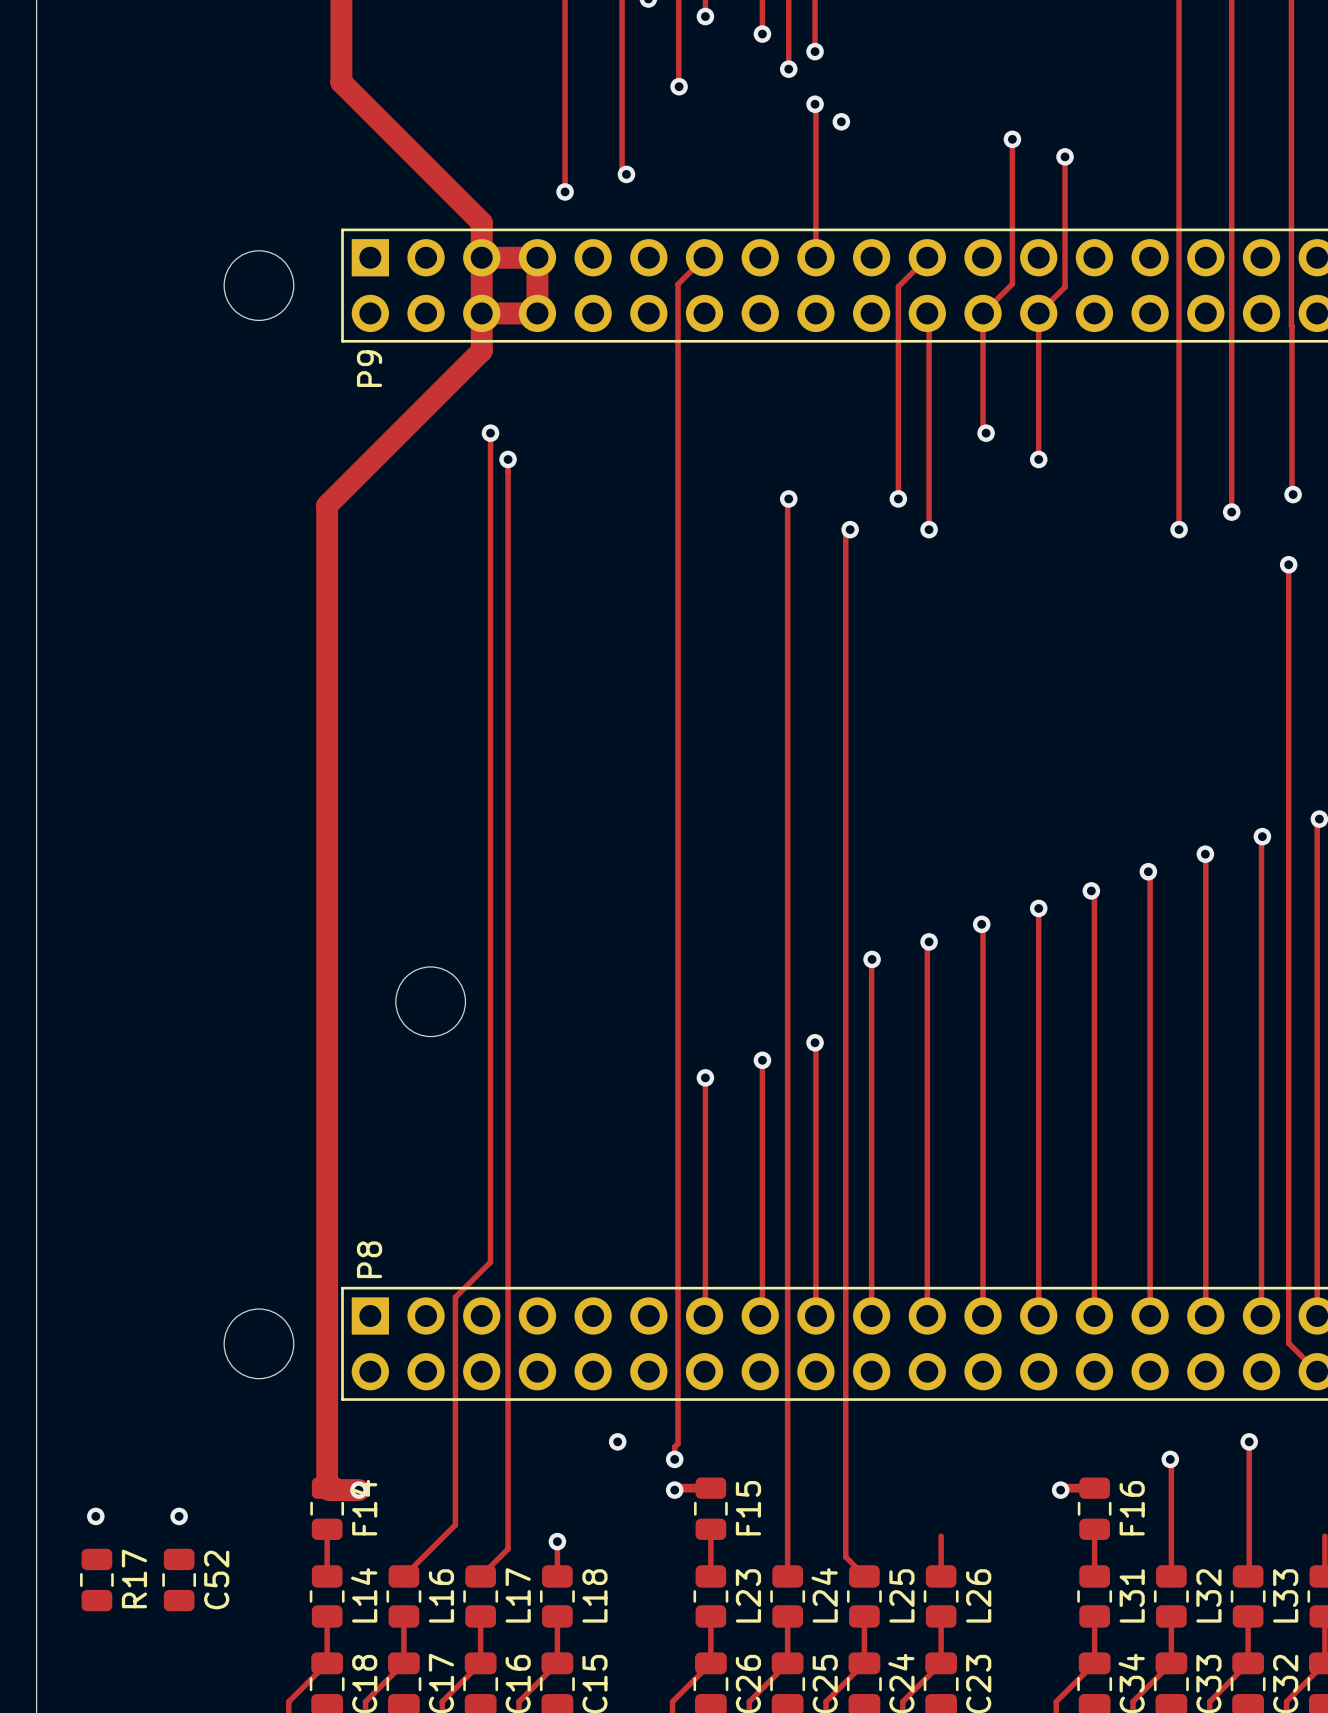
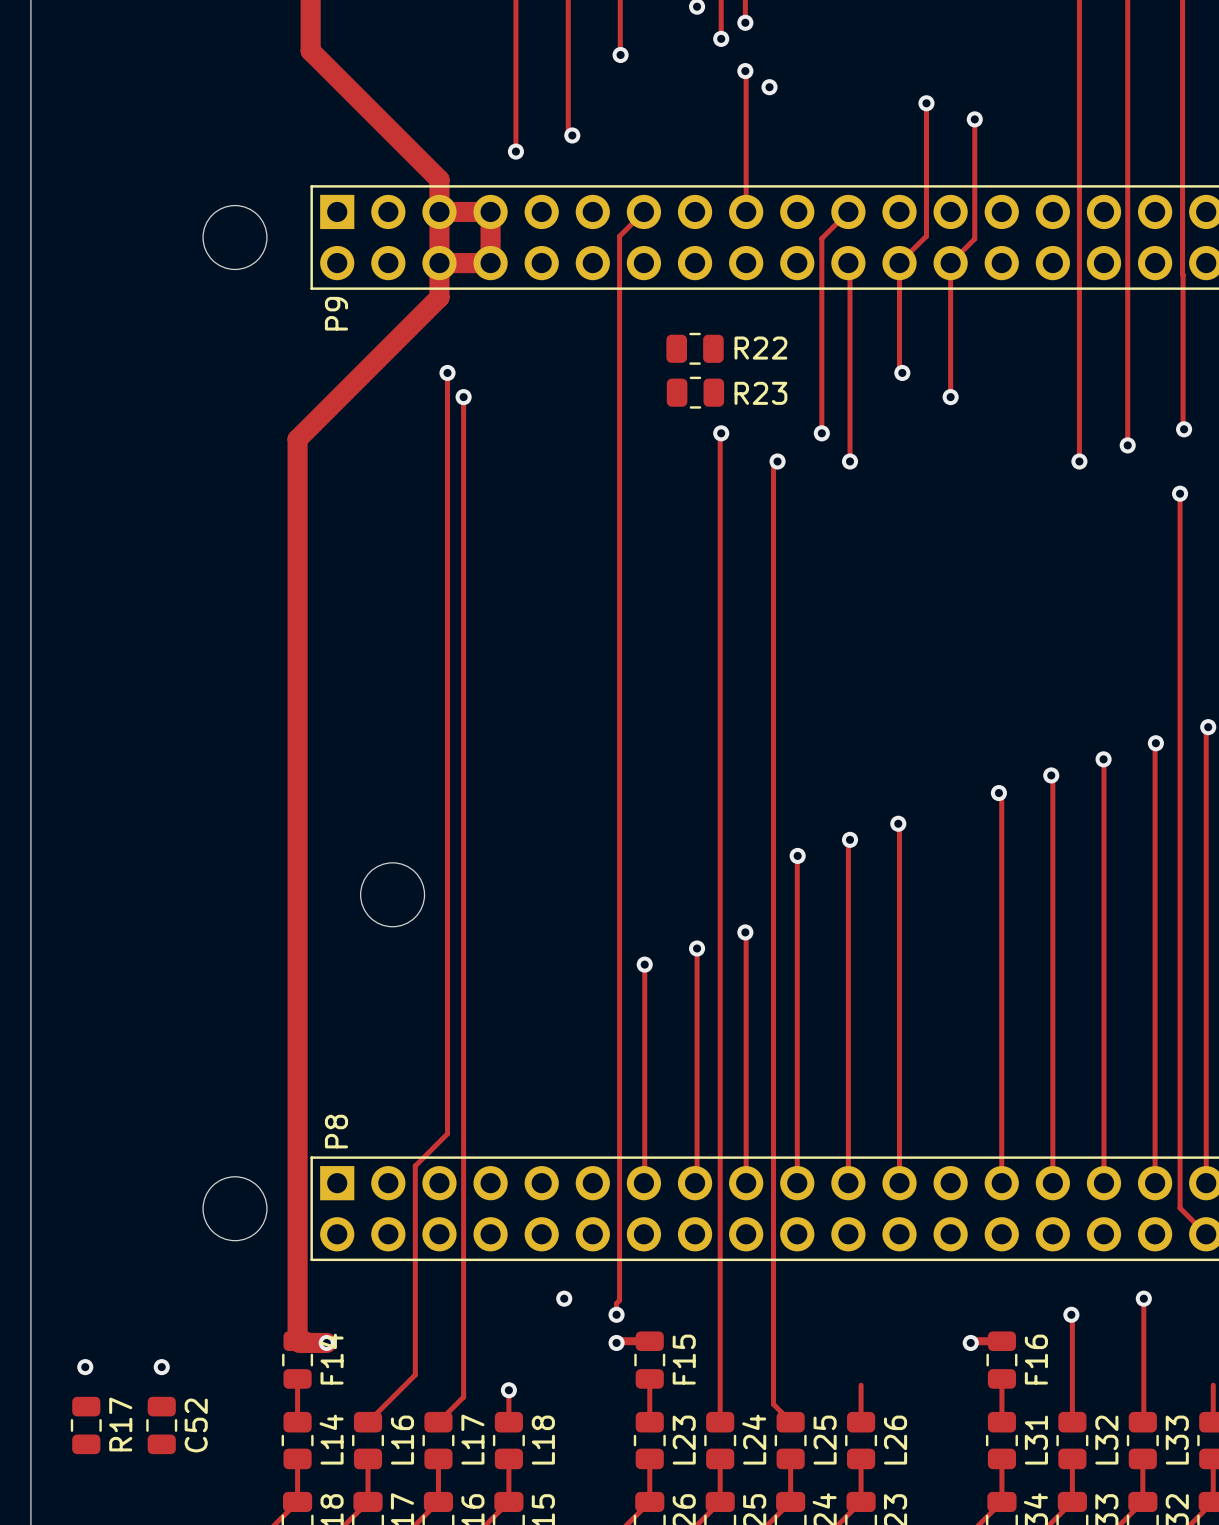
R22: none -> (695, 348)
R23: none -> (695, 392)
track: (1038, 908) (1038, 1315) -> none
via: (1038, 908) -> none

